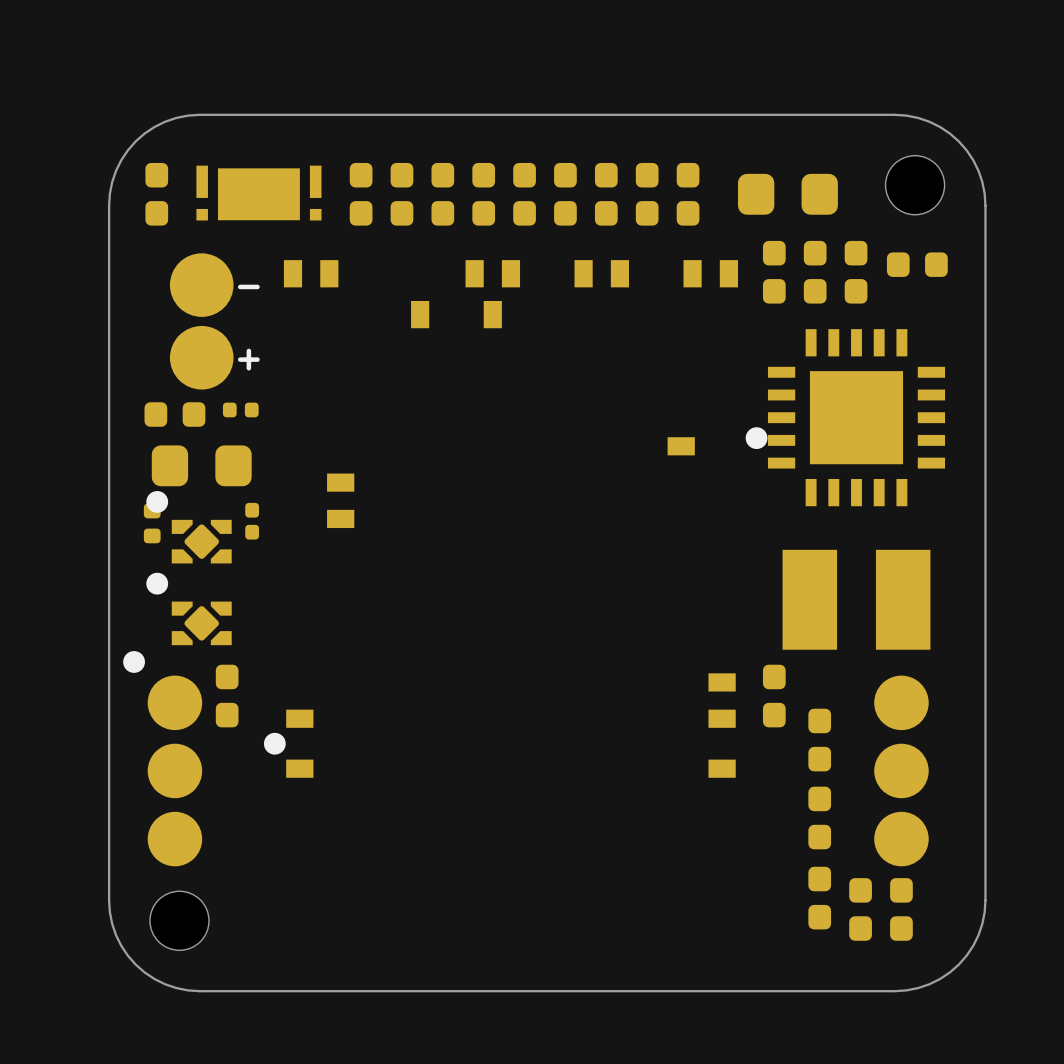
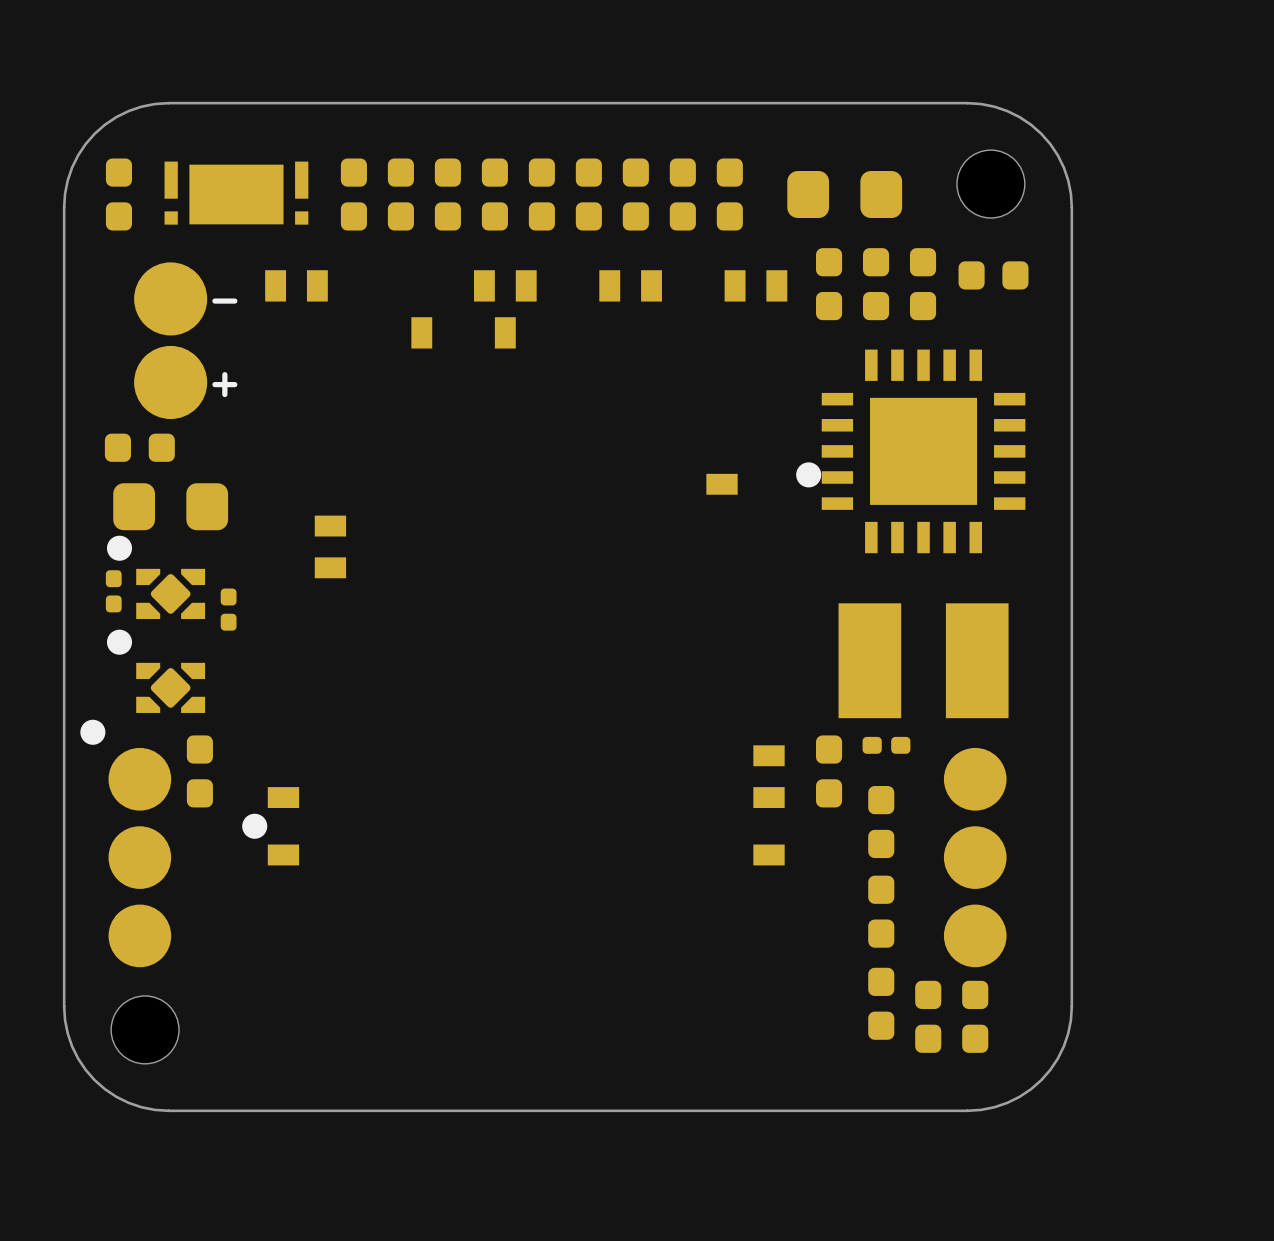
part: (240, 409) -> none
part footprint: [143, 503, 161, 544] -> [105, 570, 122, 613]
part position: (252, 521) -> (228, 609)
part: none -> (886, 745)

